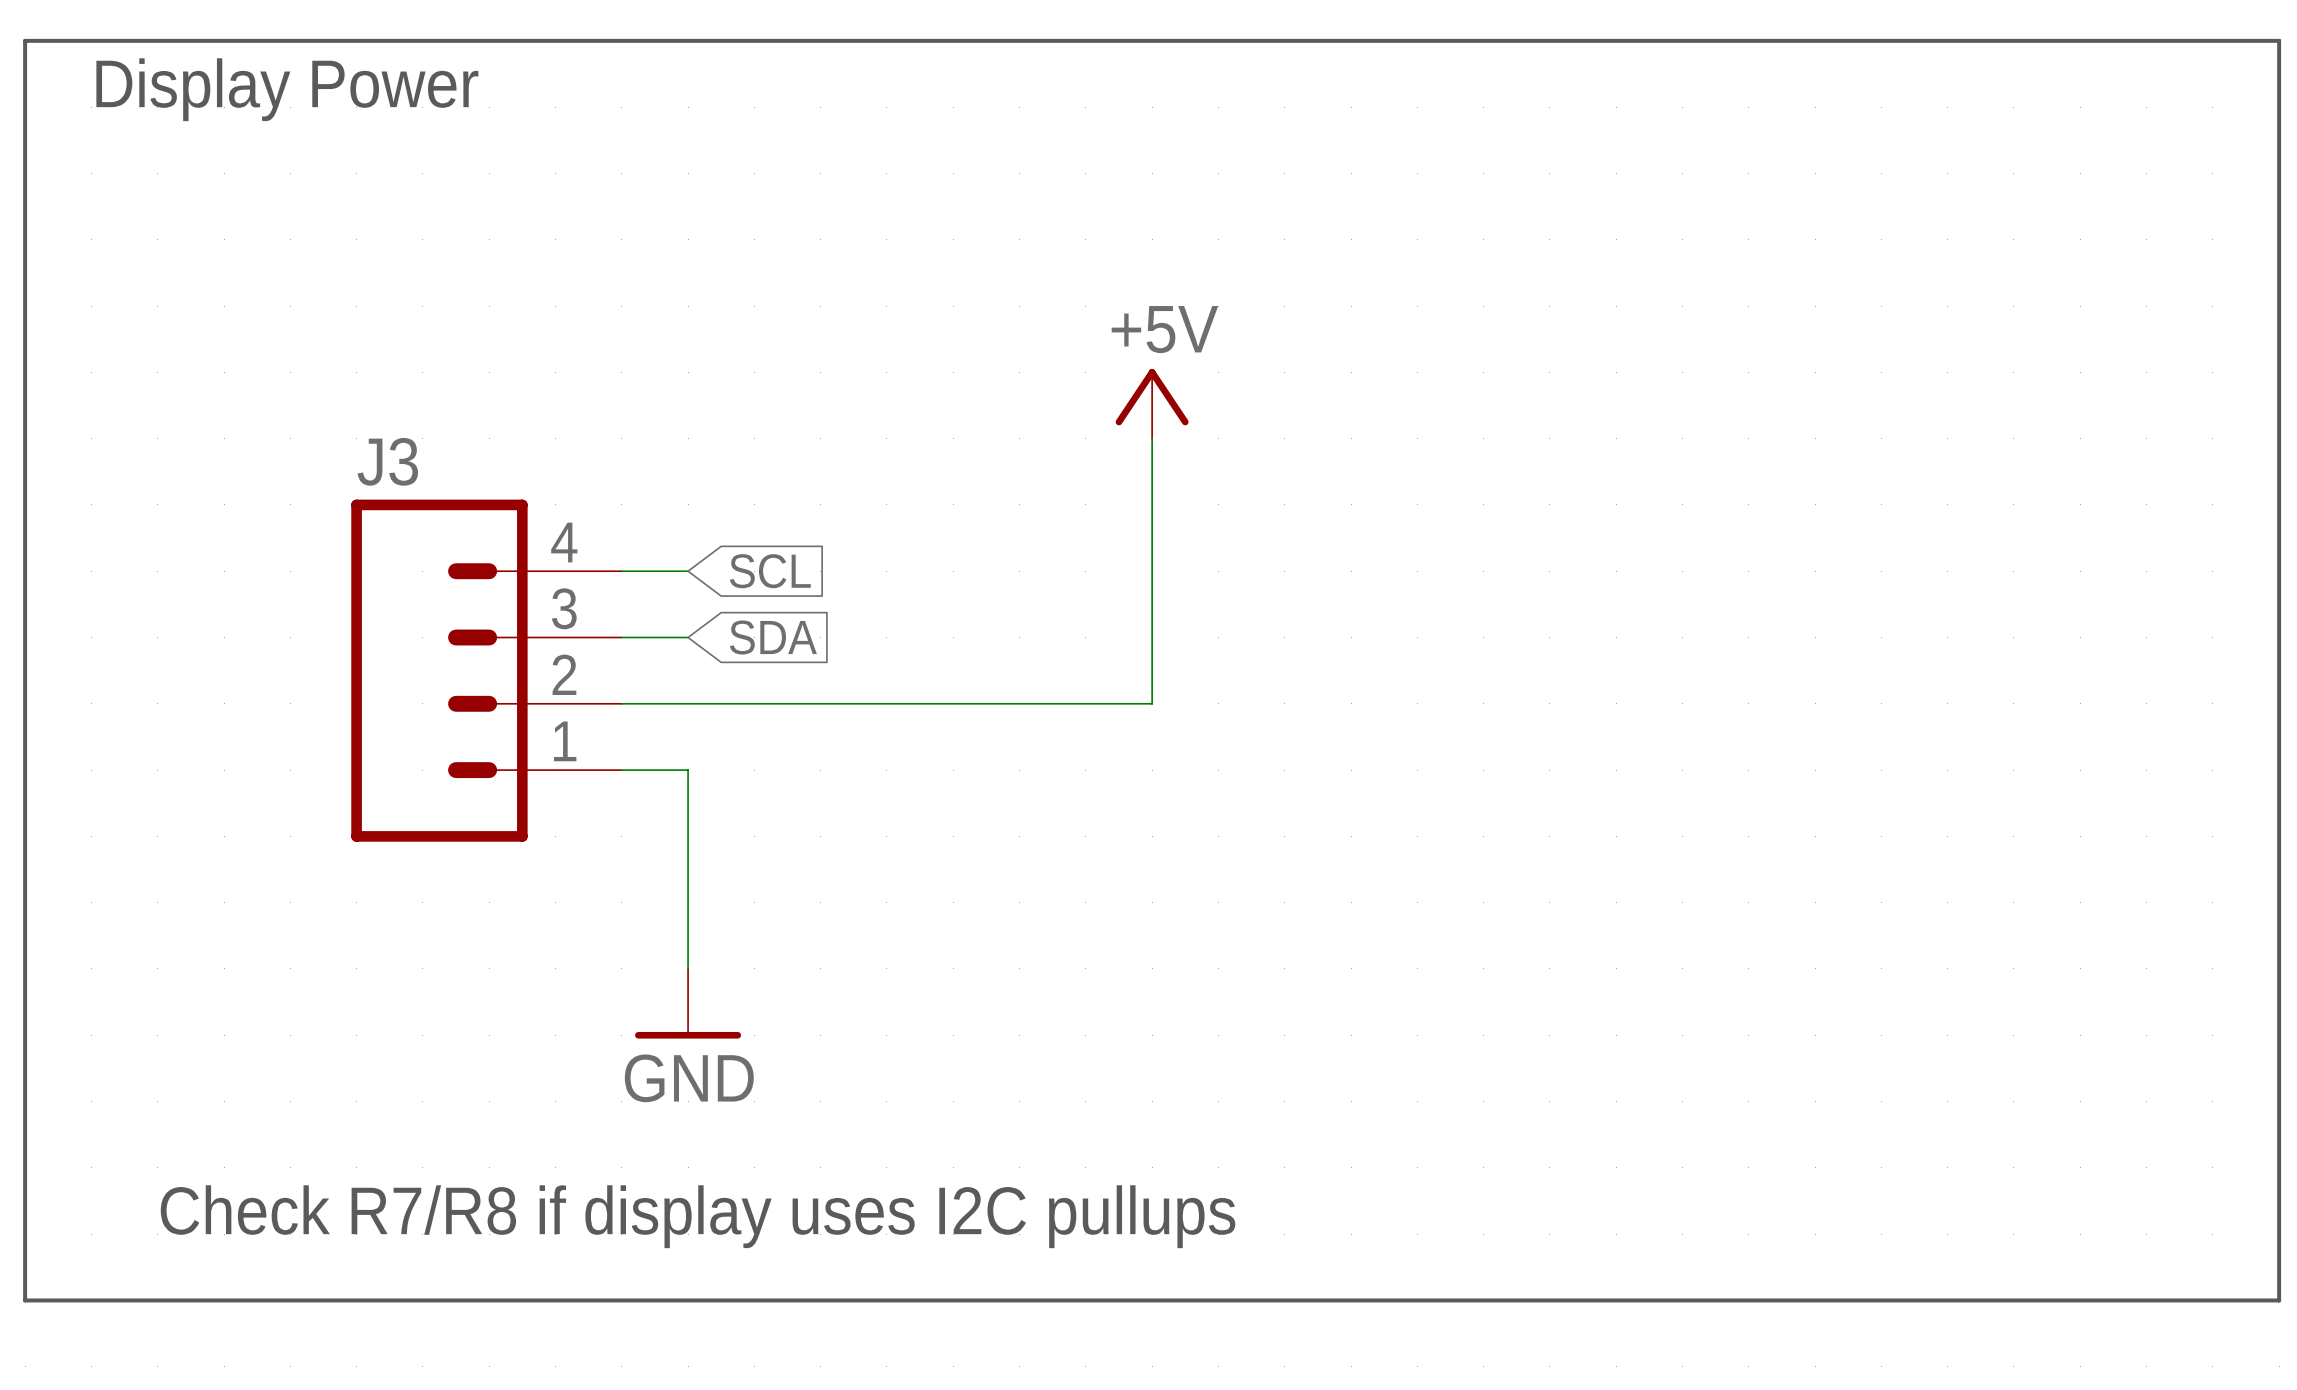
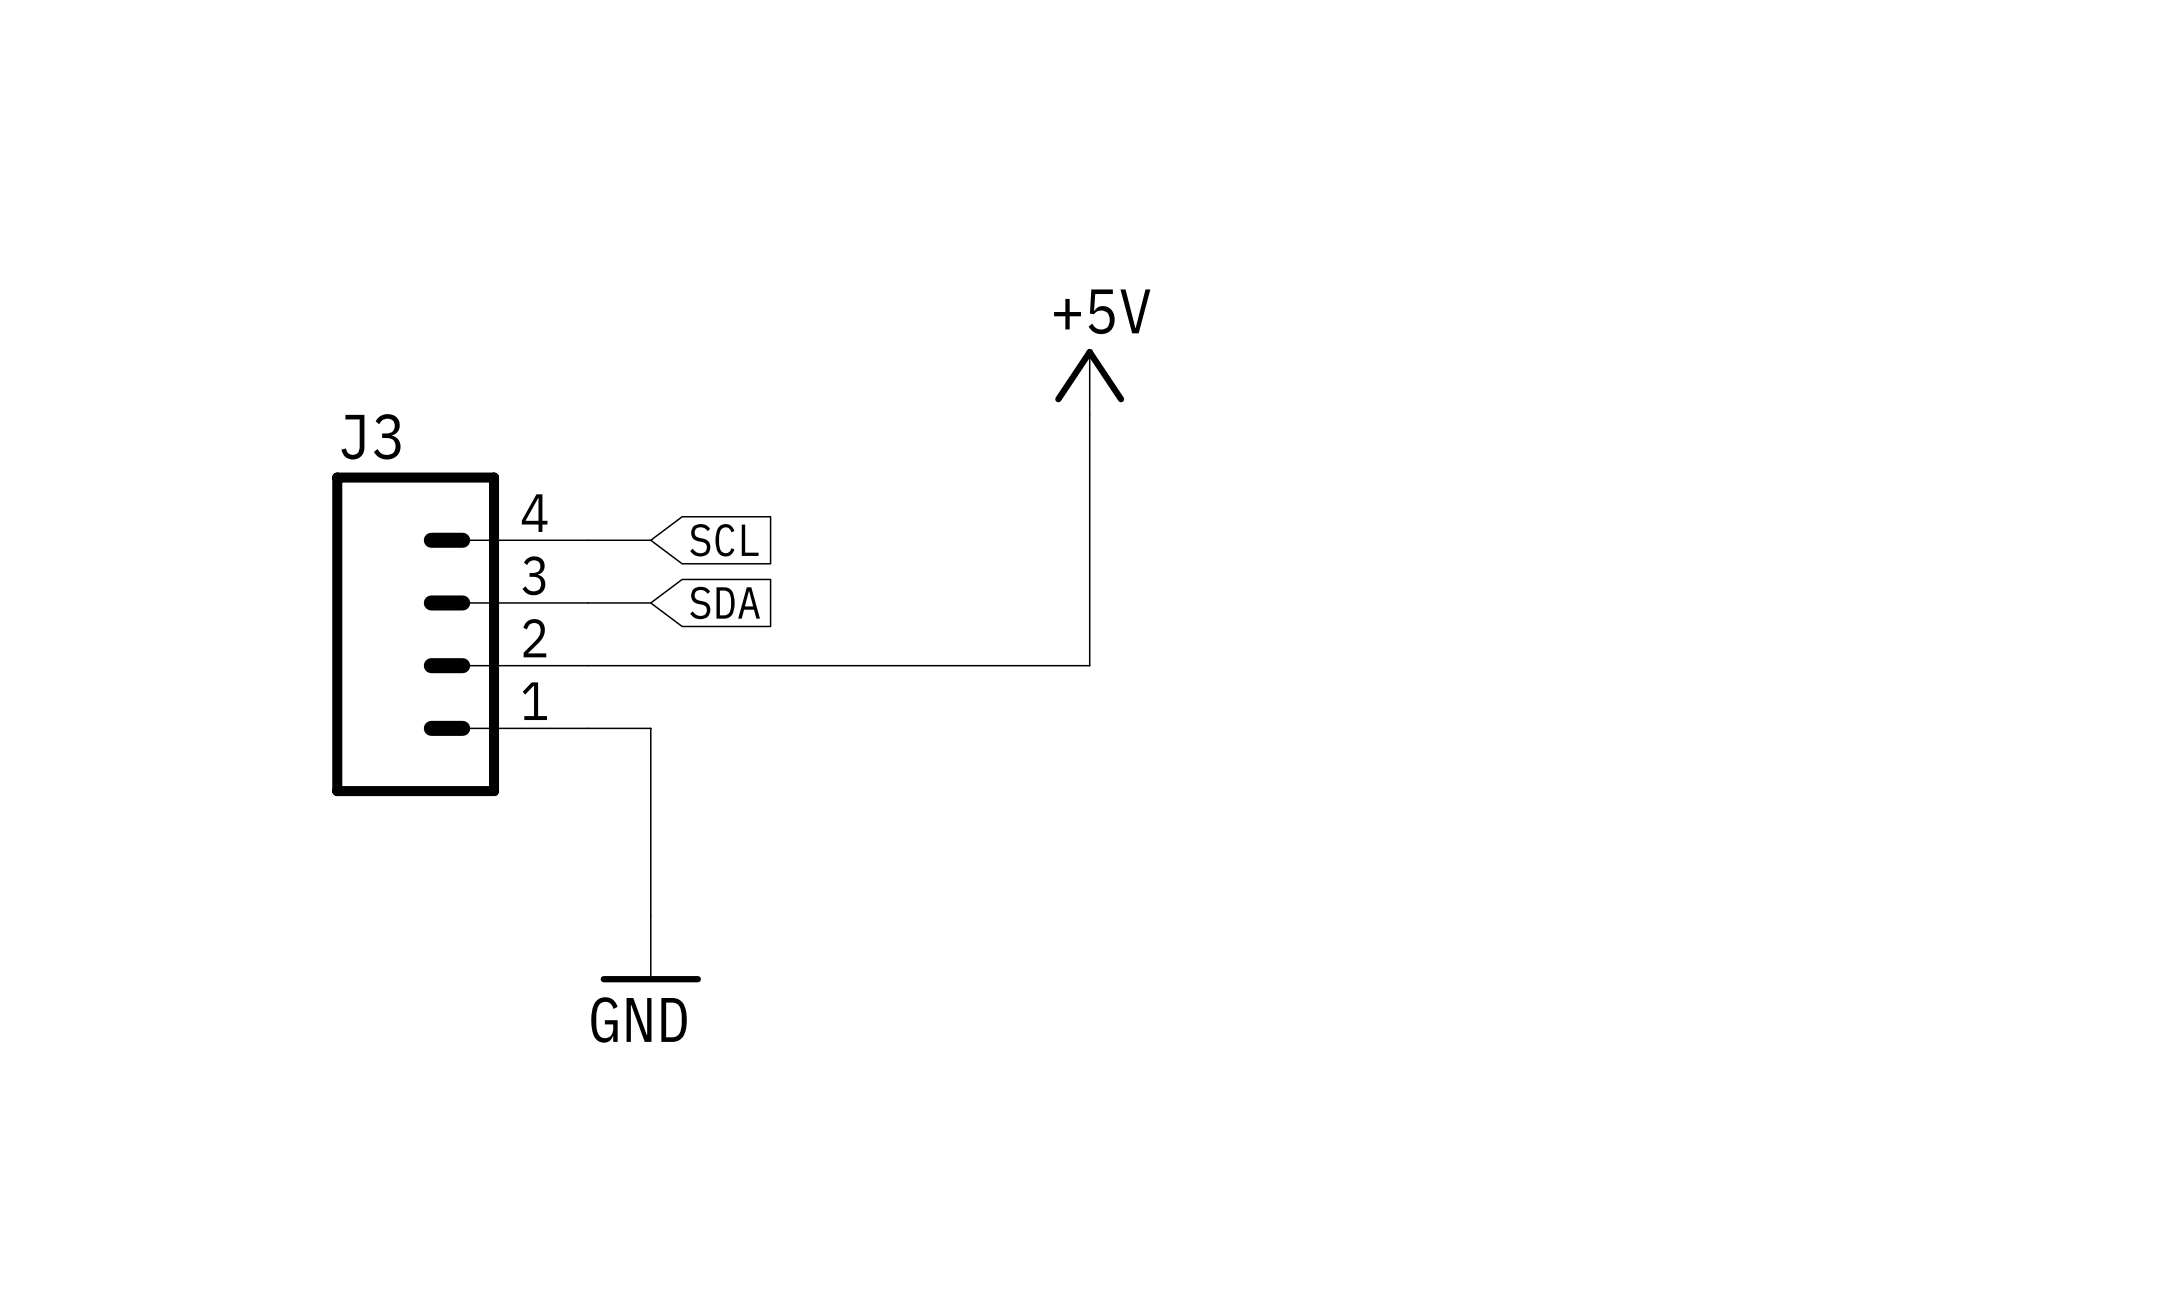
line: (25, 40) (25, 1300) (2279, 1300) (2279, 40) (25, 40) -> none
text: Display Power (287, 89) -> none
text: Check R7/R8 if display uses I2C pullups (698, 1216) -> none

